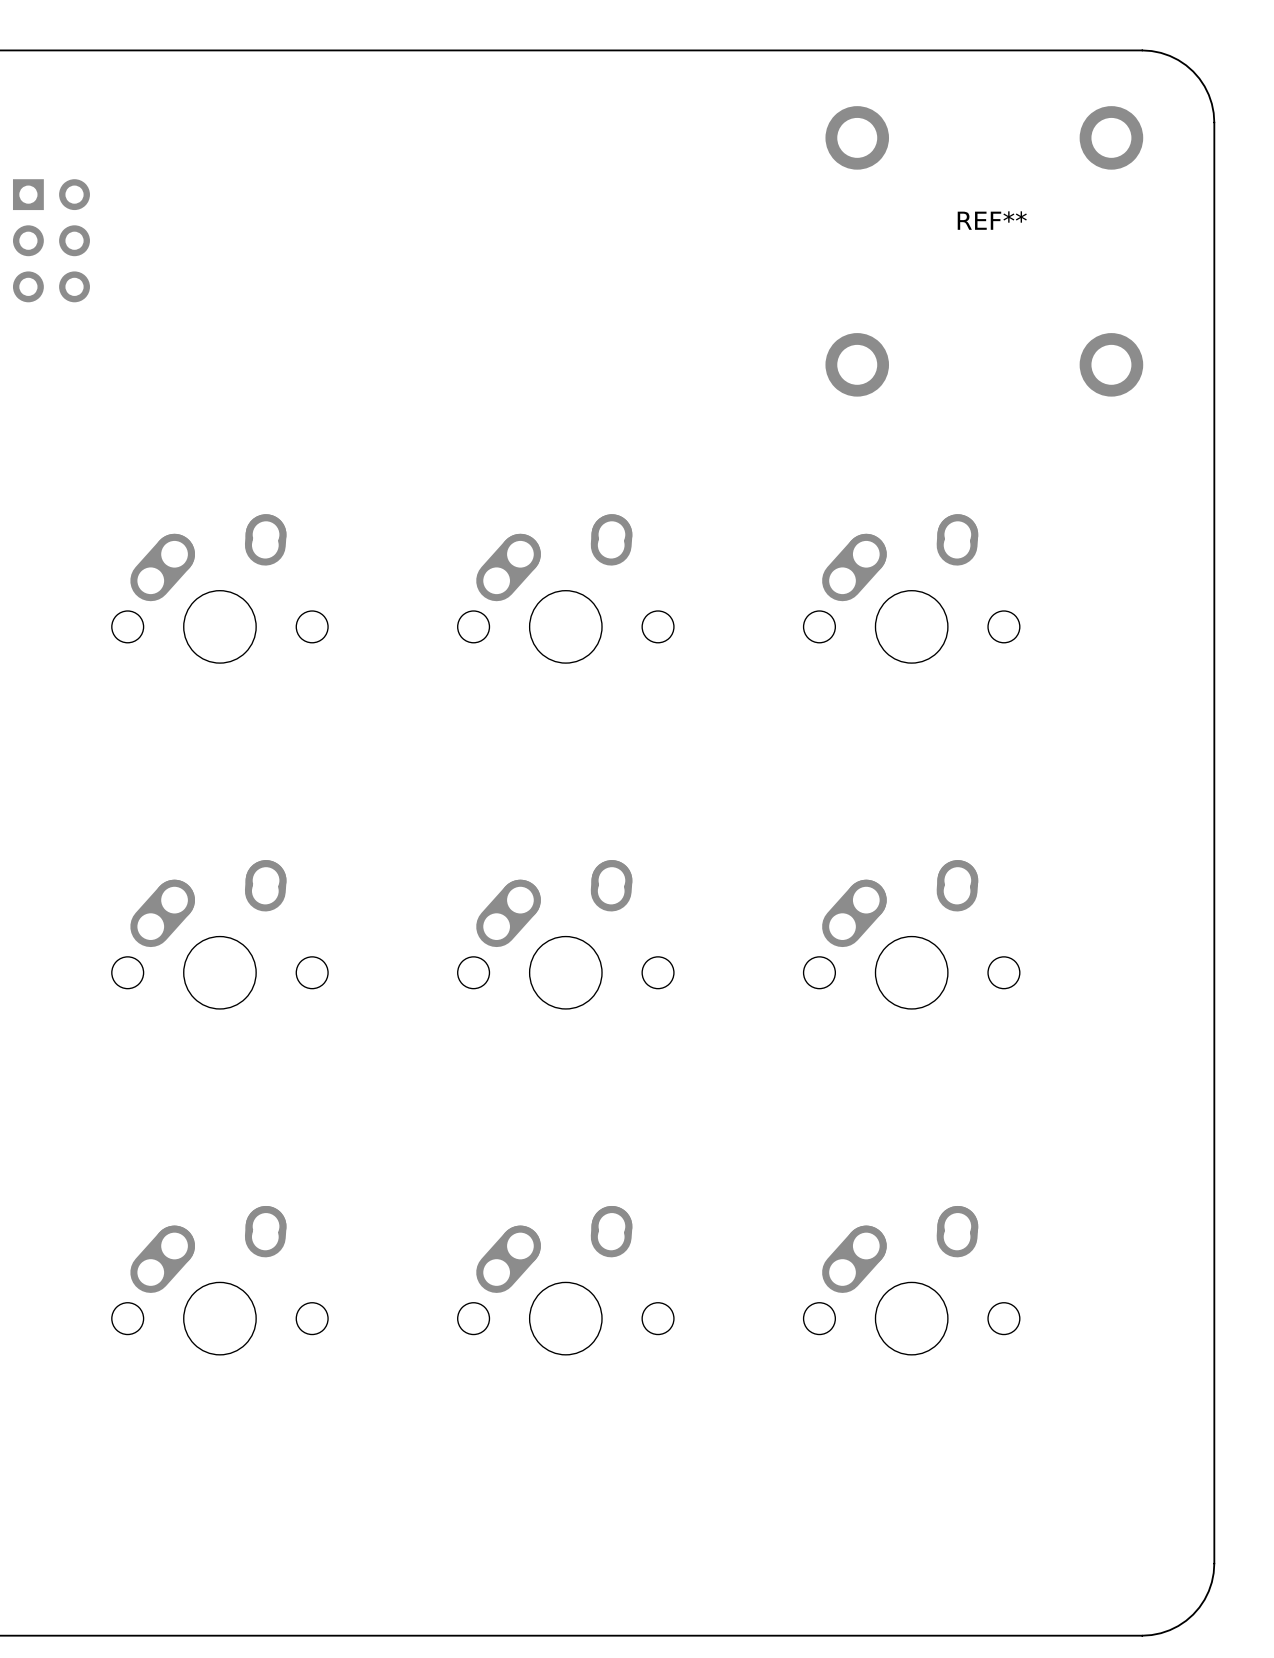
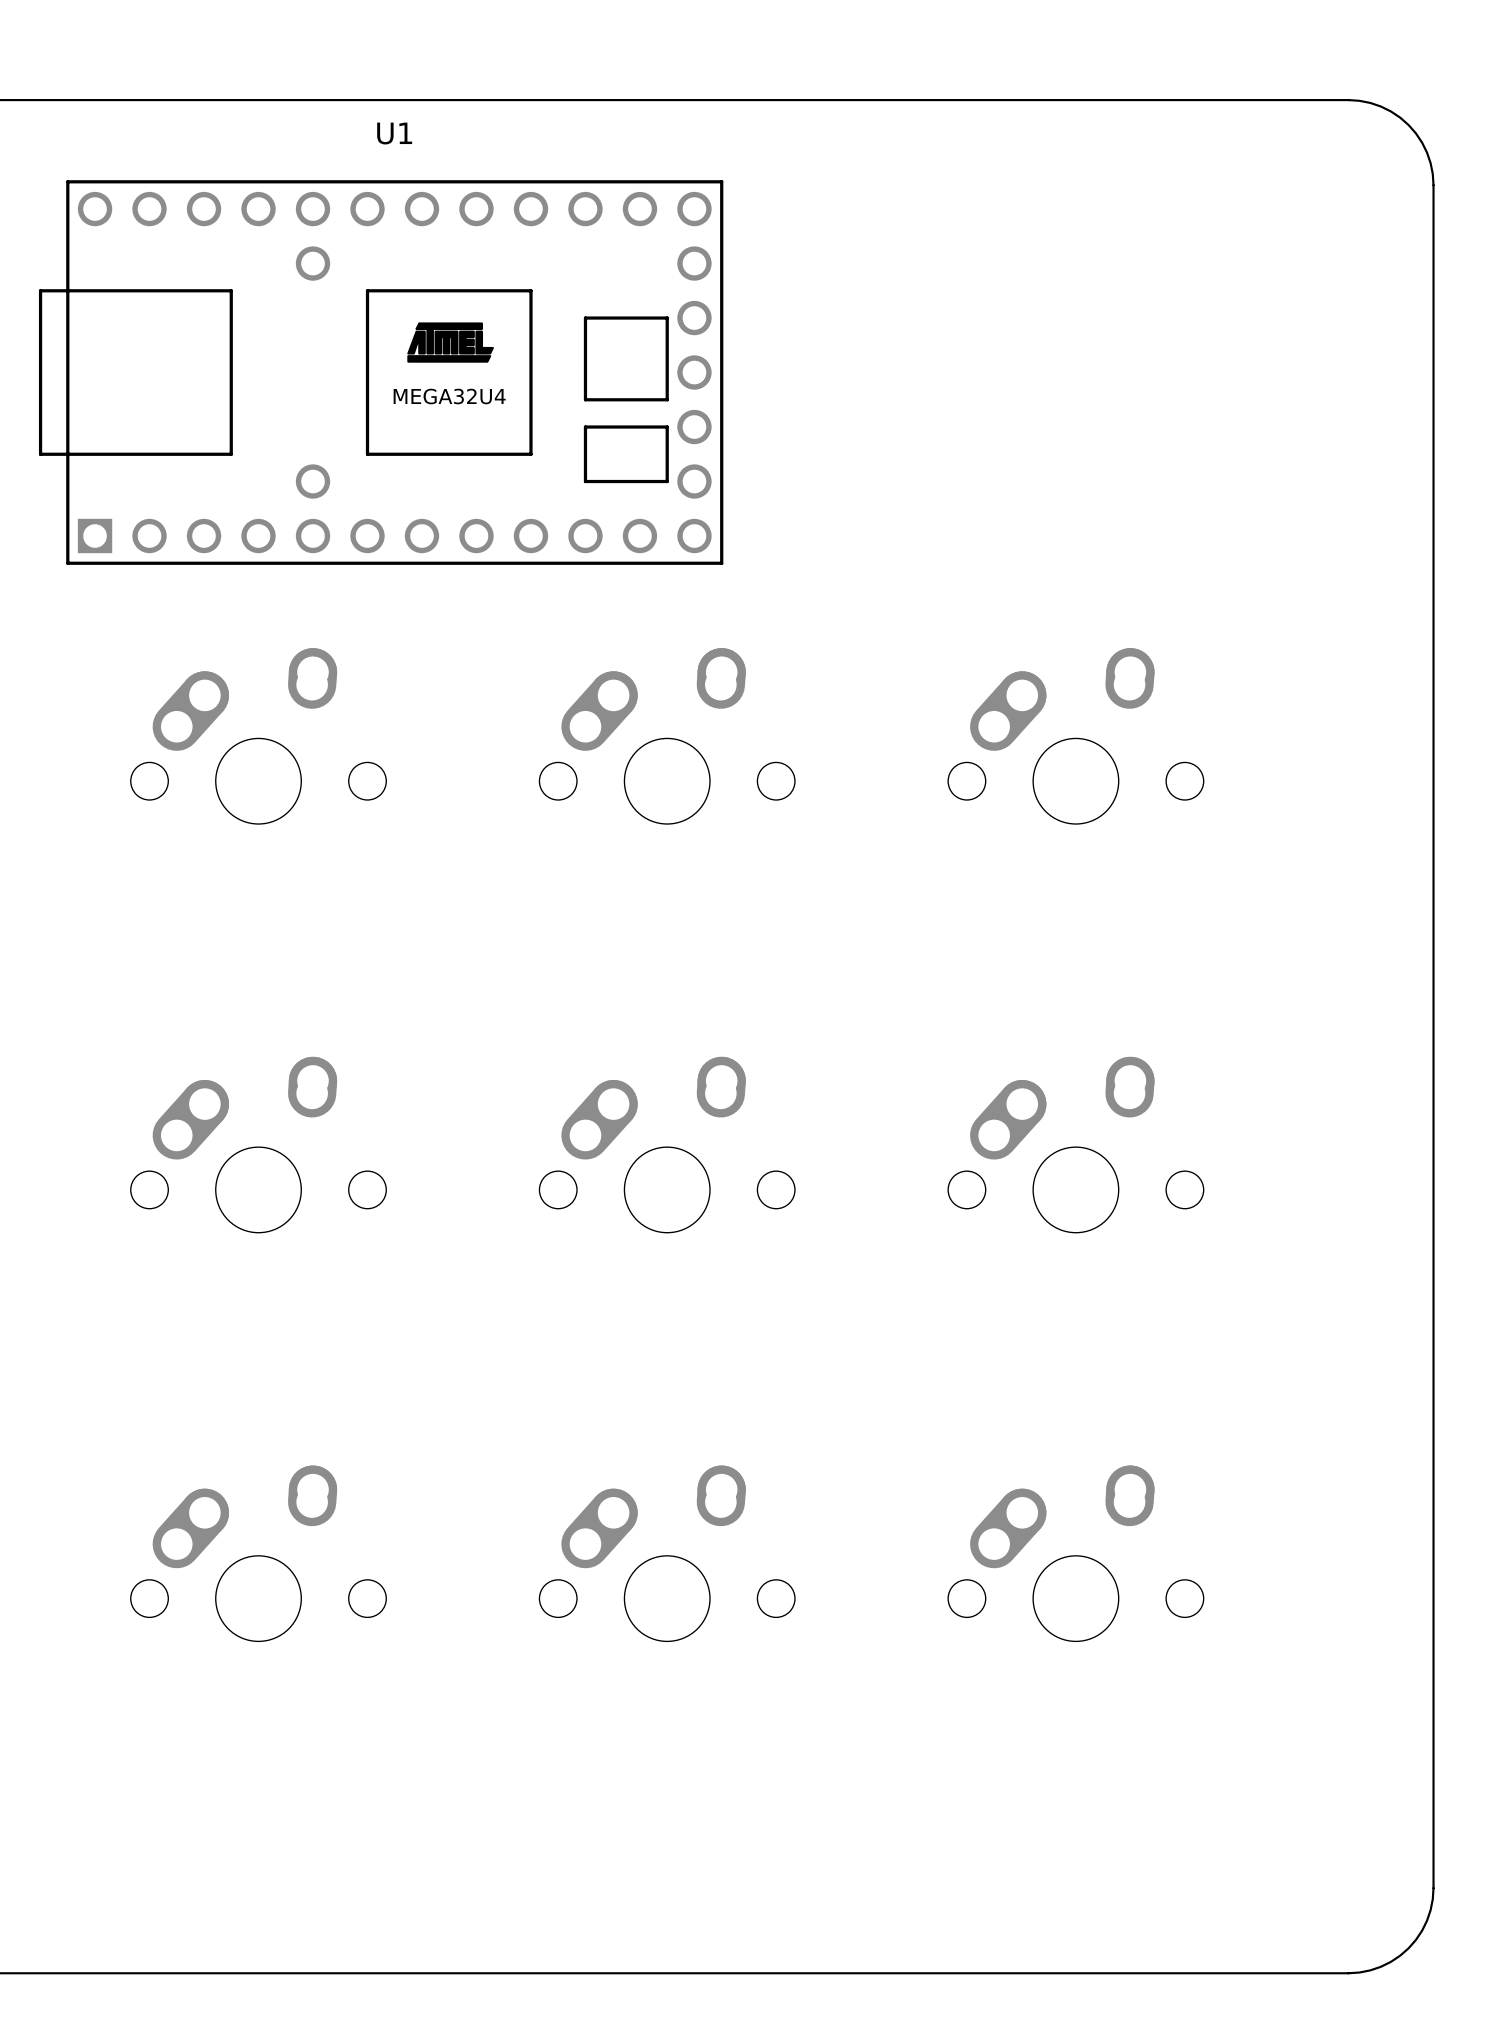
part: (51, 240) -> none
REF**: (984, 251) -> none
U1: none -> (381, 372)

